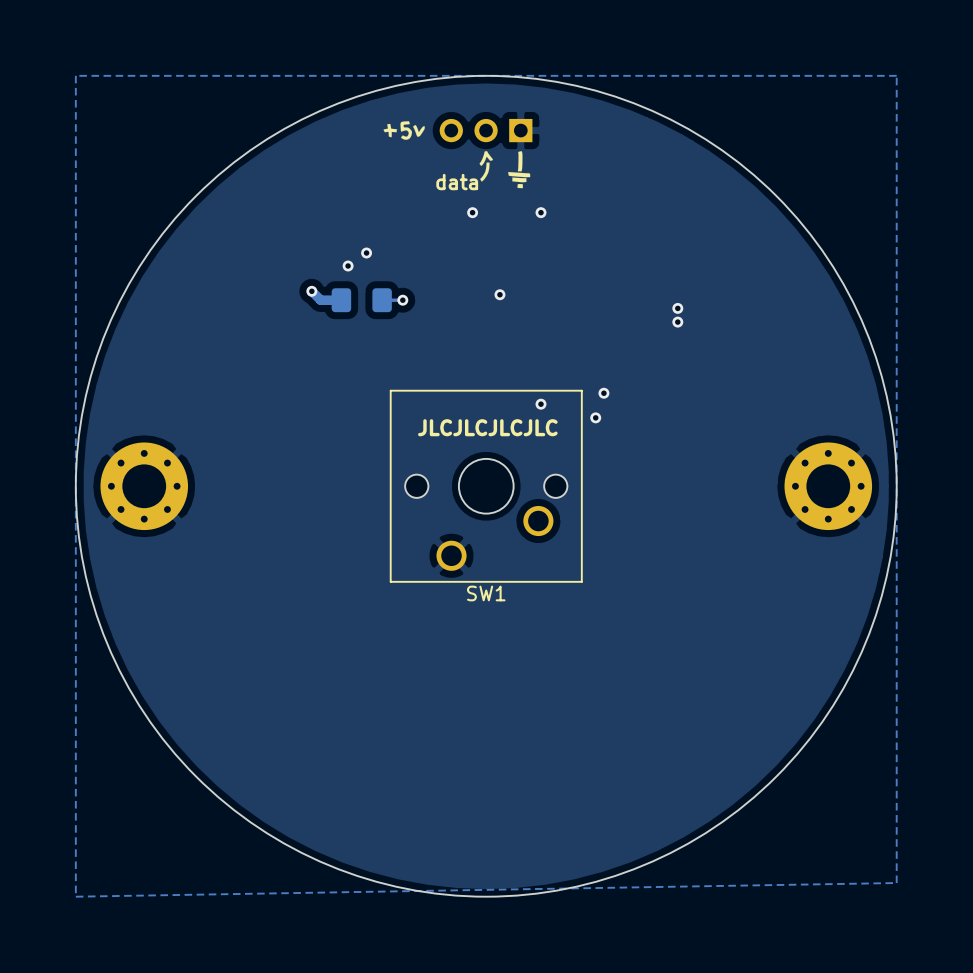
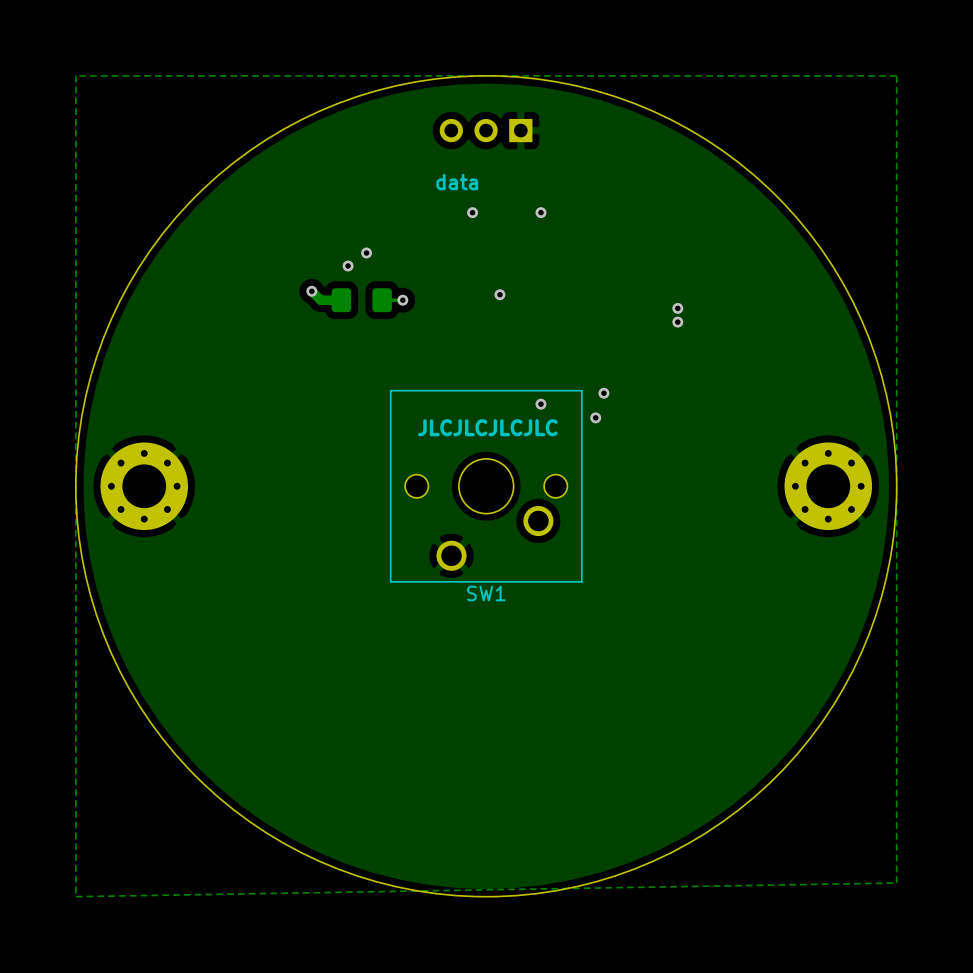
drawing: [383, 121, 425, 140] -> none
drawing: [479, 151, 531, 189] -> none

